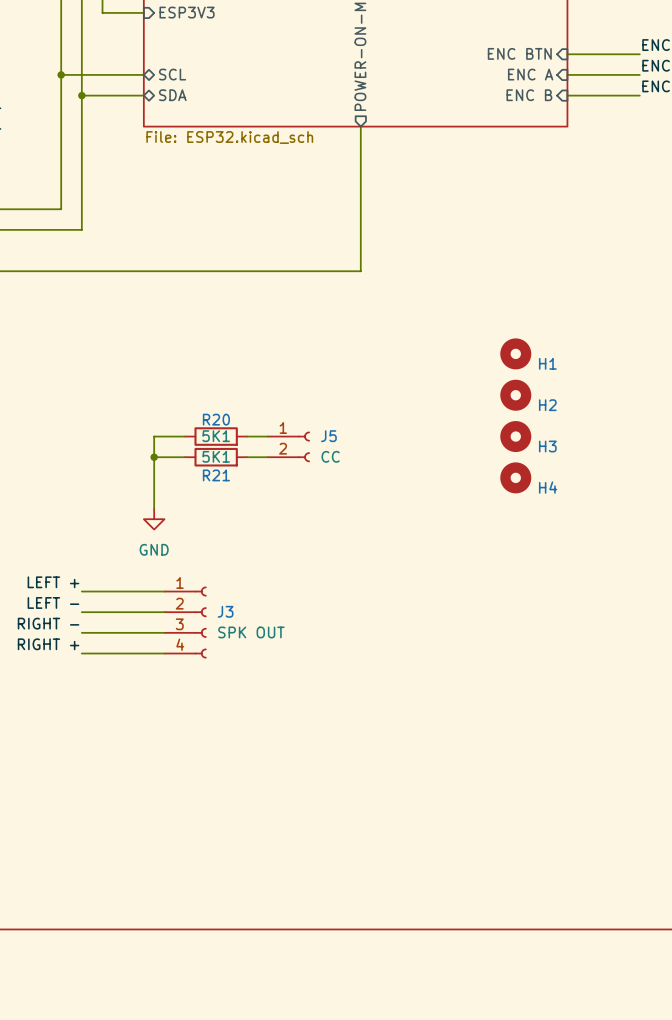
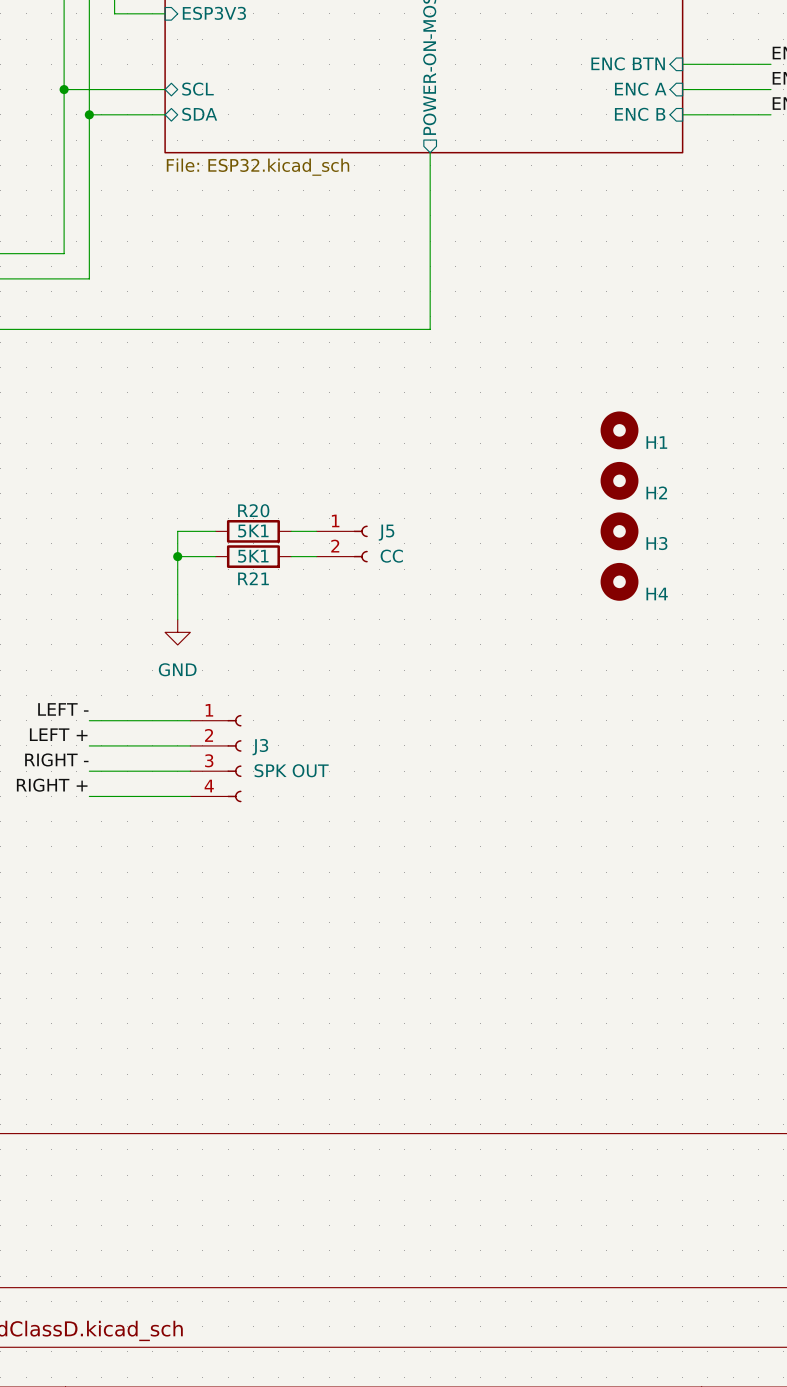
label: LEFT + (53, 582) -> LEFT - (63, 709)
label: LEFT - (53, 602) -> LEFT + (58, 734)

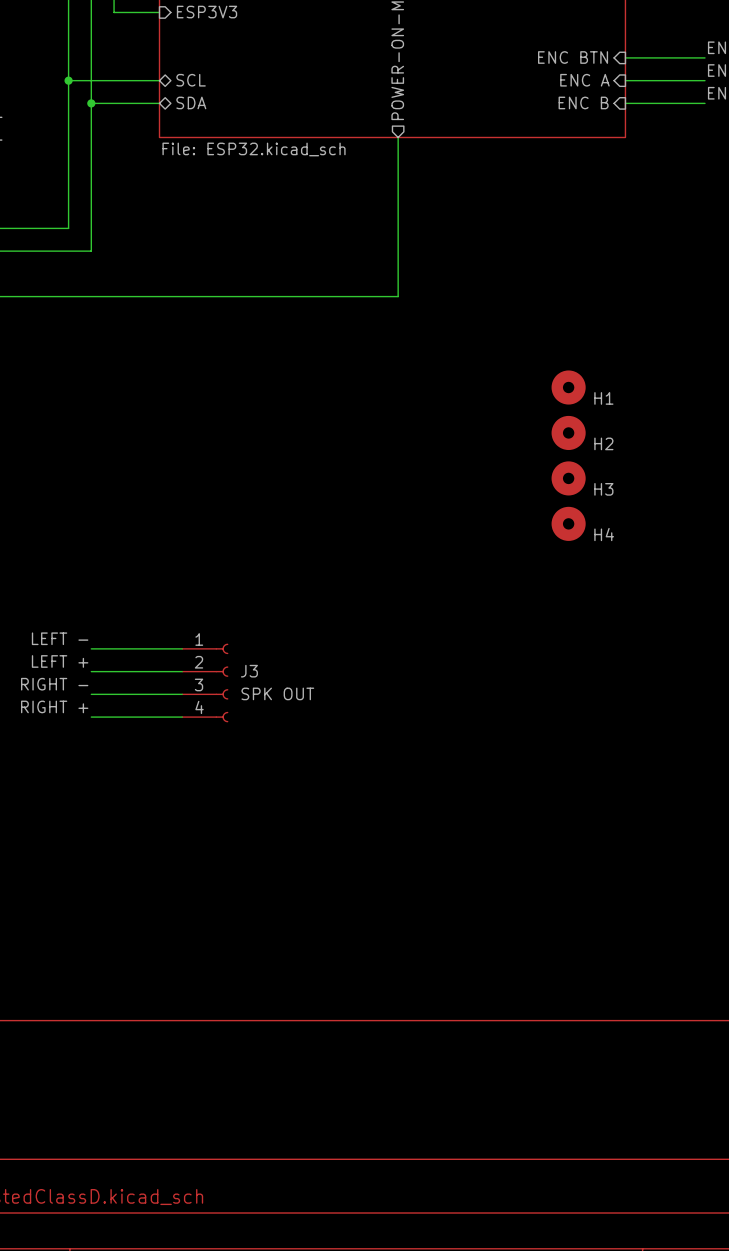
wire: (215, 531) (177, 531) (177, 619) -> none
R20: 5K1 (253, 531) -> none
wire: (291, 531) (316, 531) -> none
J5: CC (342, 543) -> none
wire: (177, 556) (215, 556) -> none
junction: (177, 556) -> none
R21: 5K1 (253, 556) -> none
wire: (291, 556) (316, 556) -> none
power symbol: GND (177, 632) -> none

